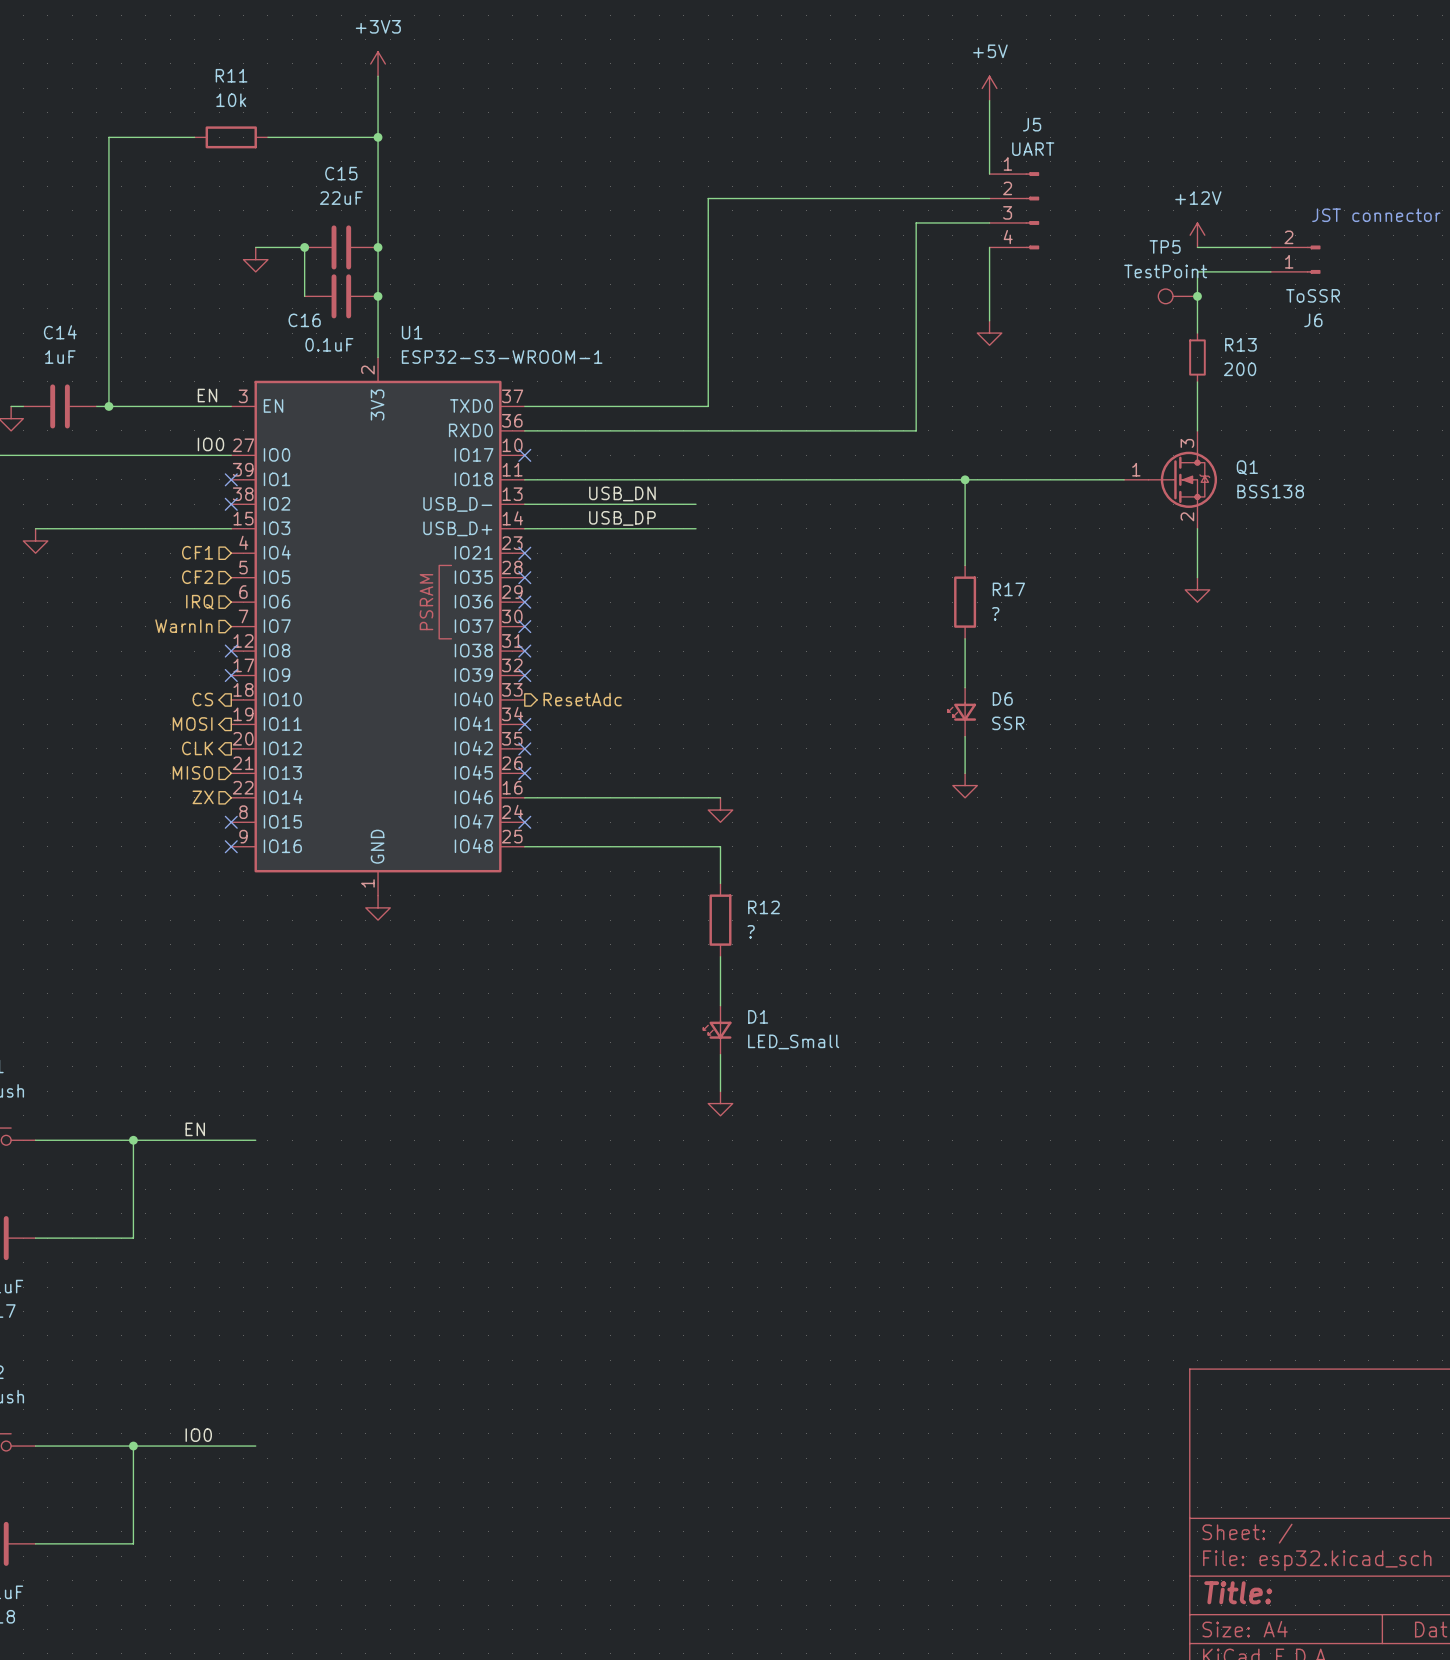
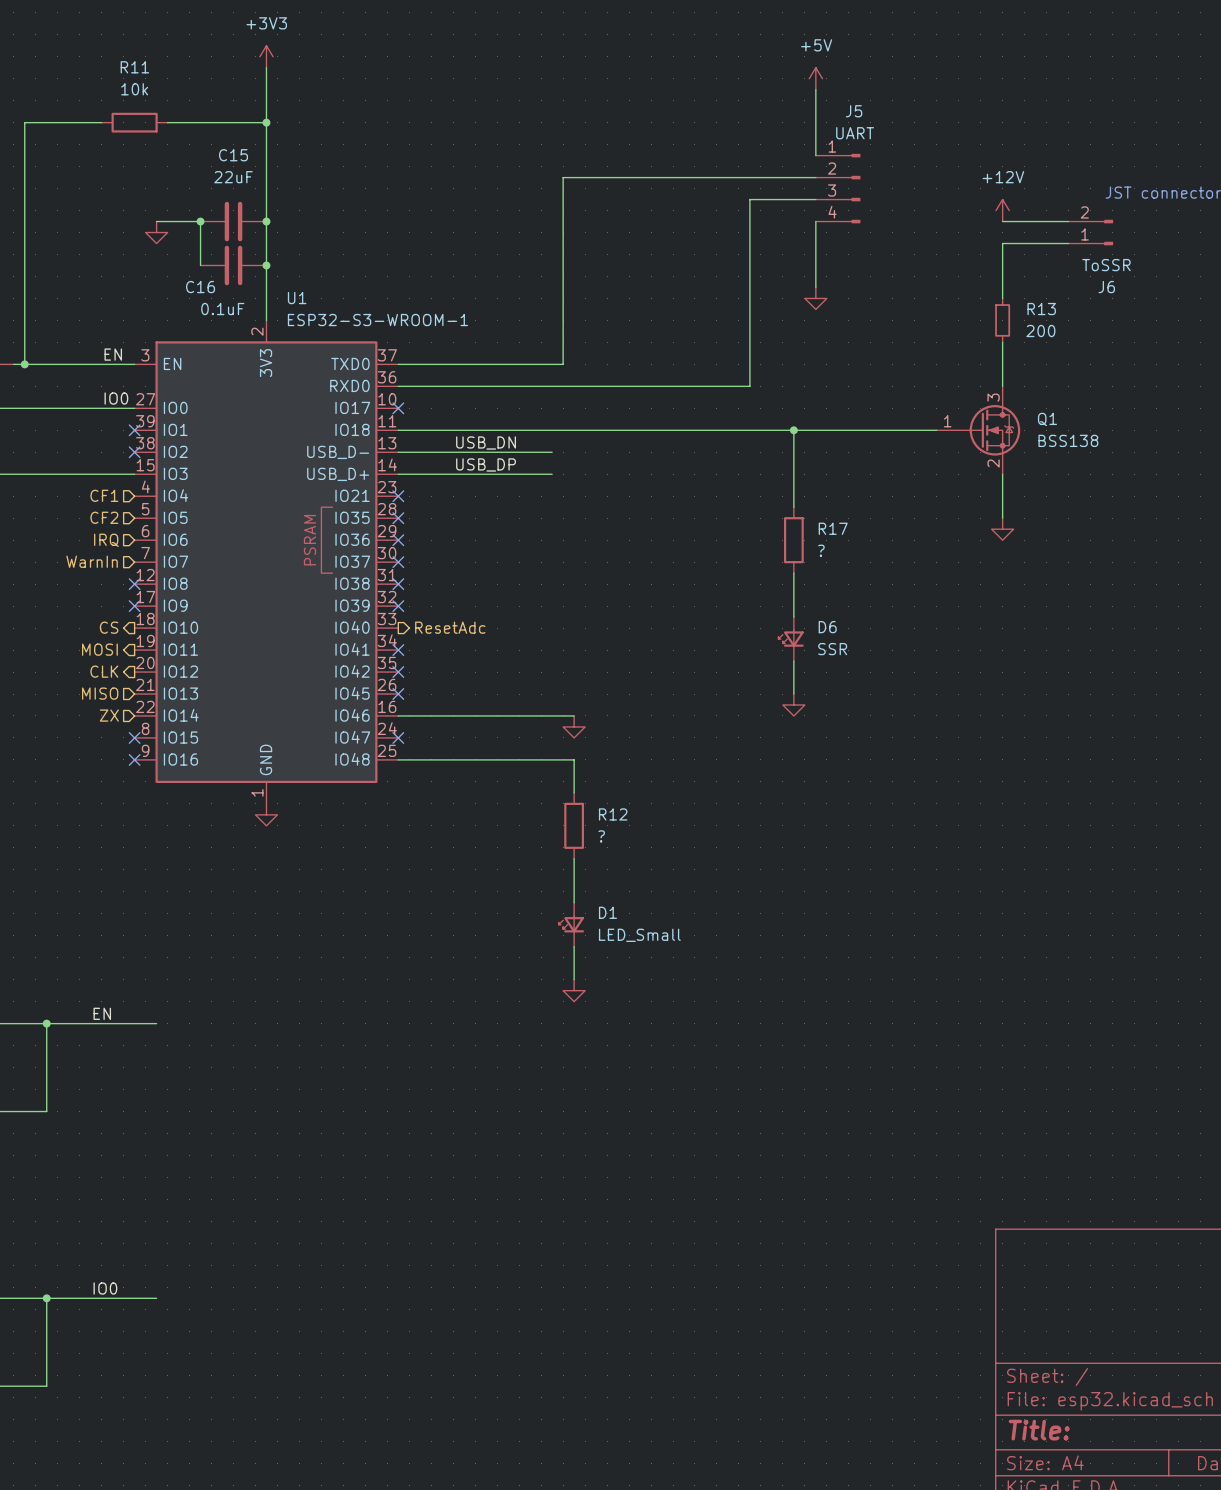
TP5: TestPoint (1177, 296) -> none
junction: (1197, 296) -> none

